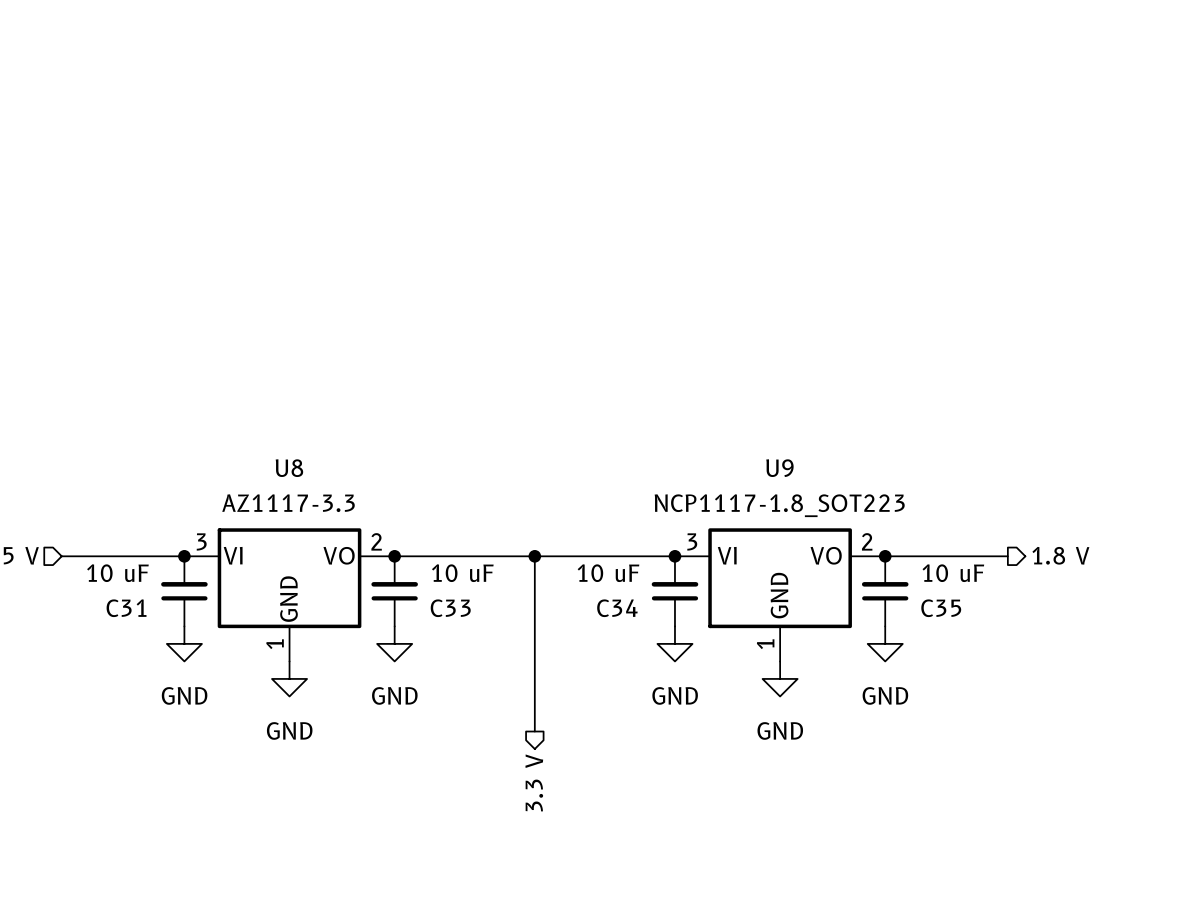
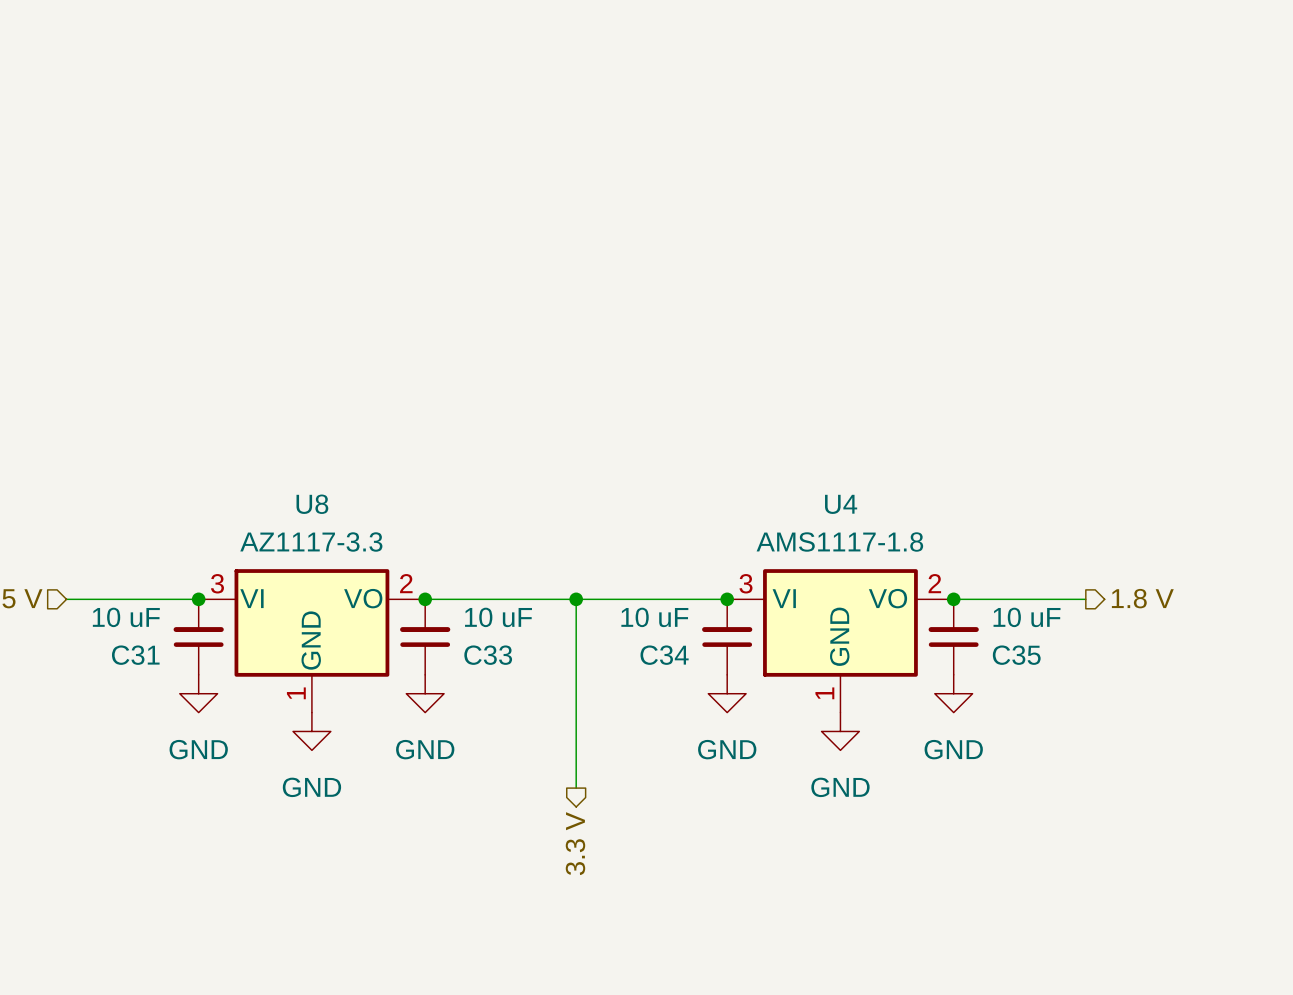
U9 name: U9 (779, 468) -> U4 (841, 504)
U9 value: NCP1117-1.8_SOT223 (779, 505) -> AMS1117-1.8 (839, 542)

